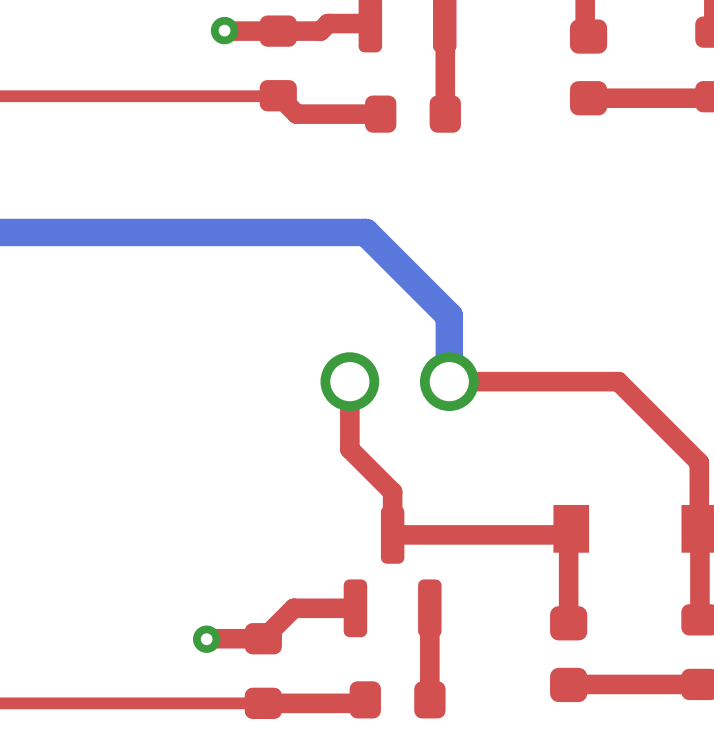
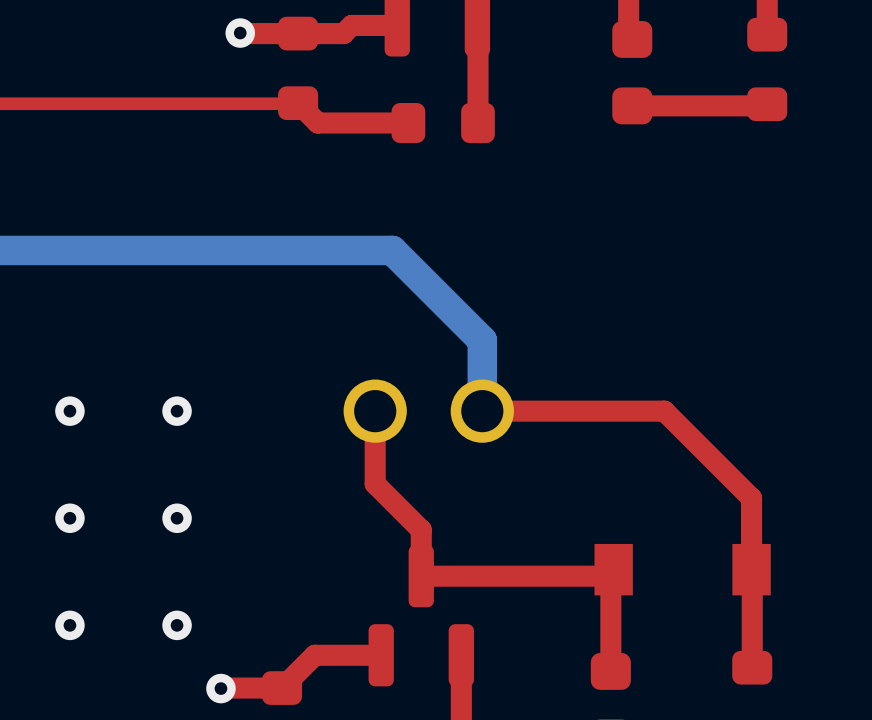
via: none -> (69, 411)
via: none -> (177, 411)
via: none -> (69, 518)
via: none -> (177, 518)
via: none -> (69, 625)
via: none -> (177, 625)

